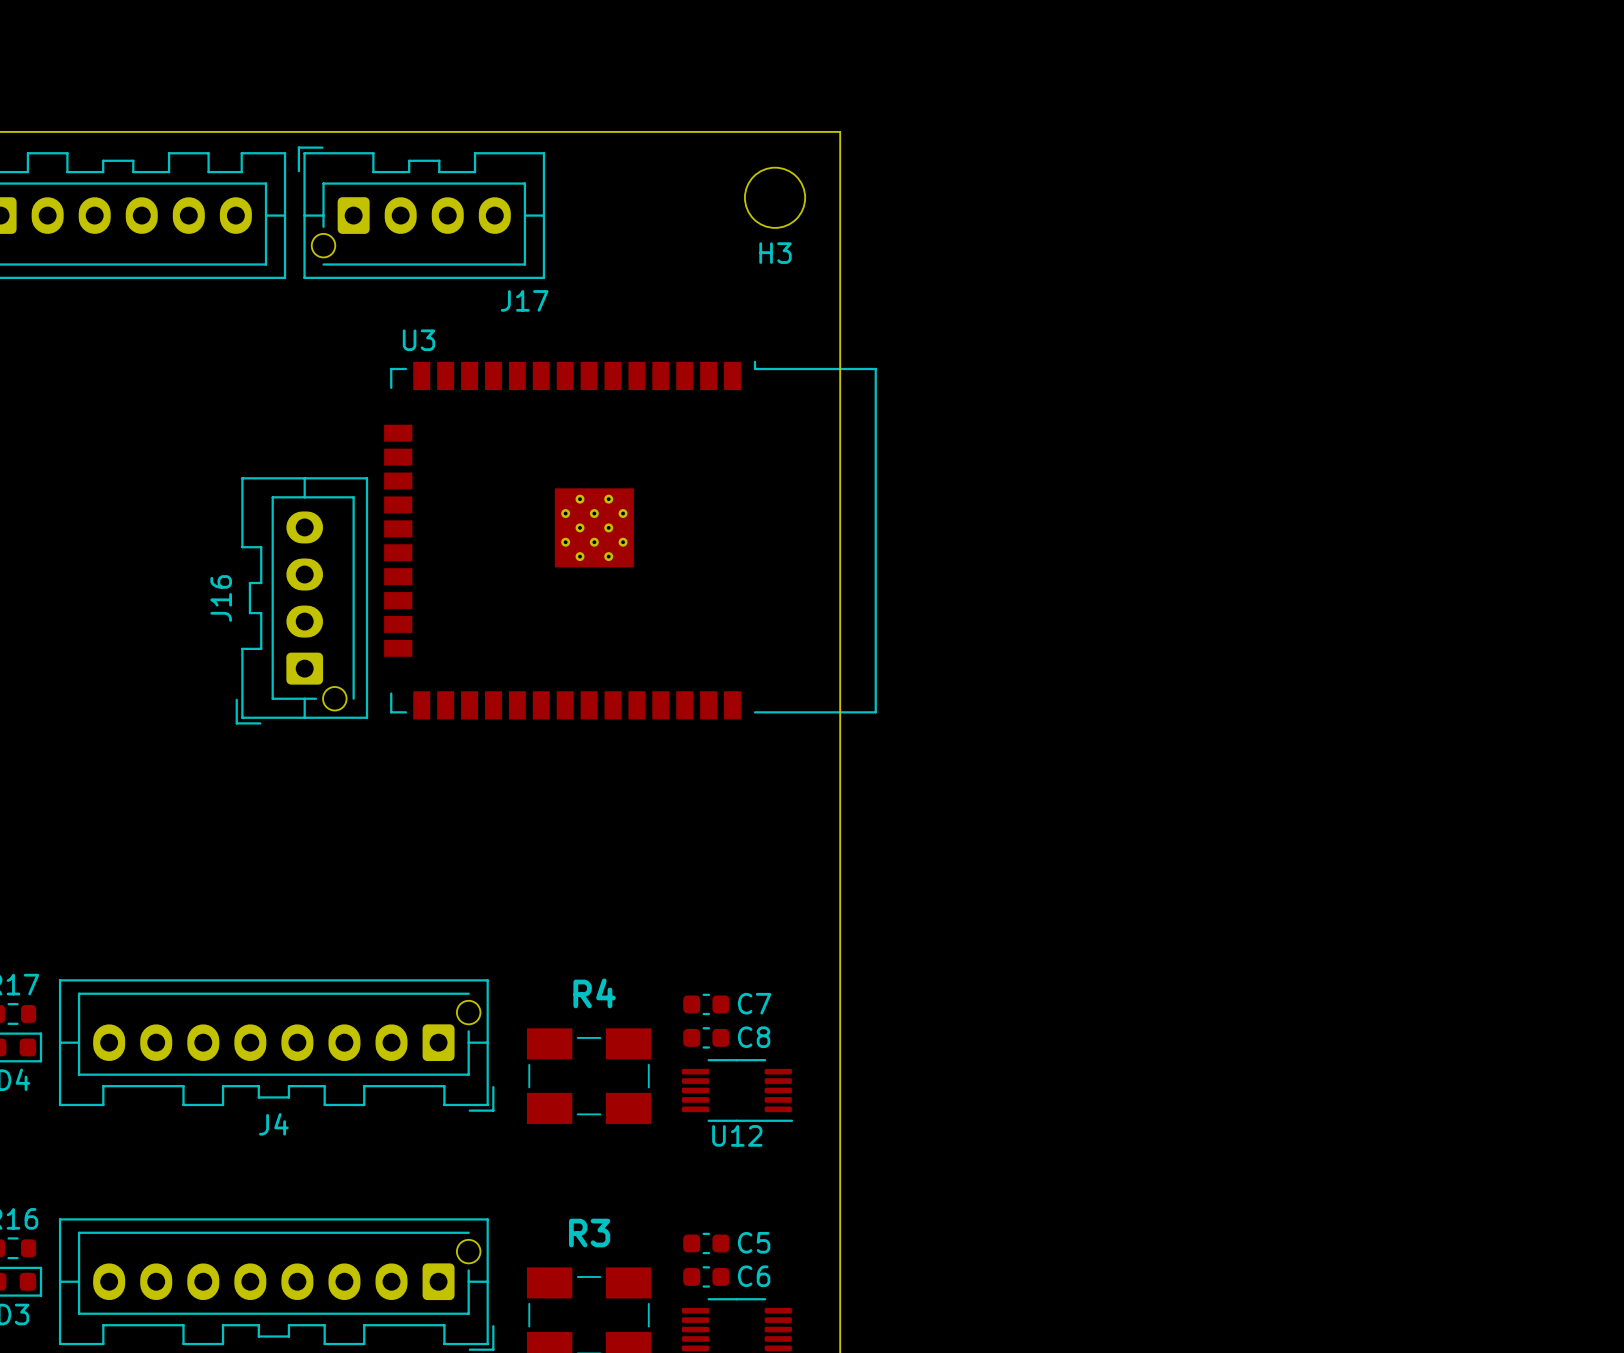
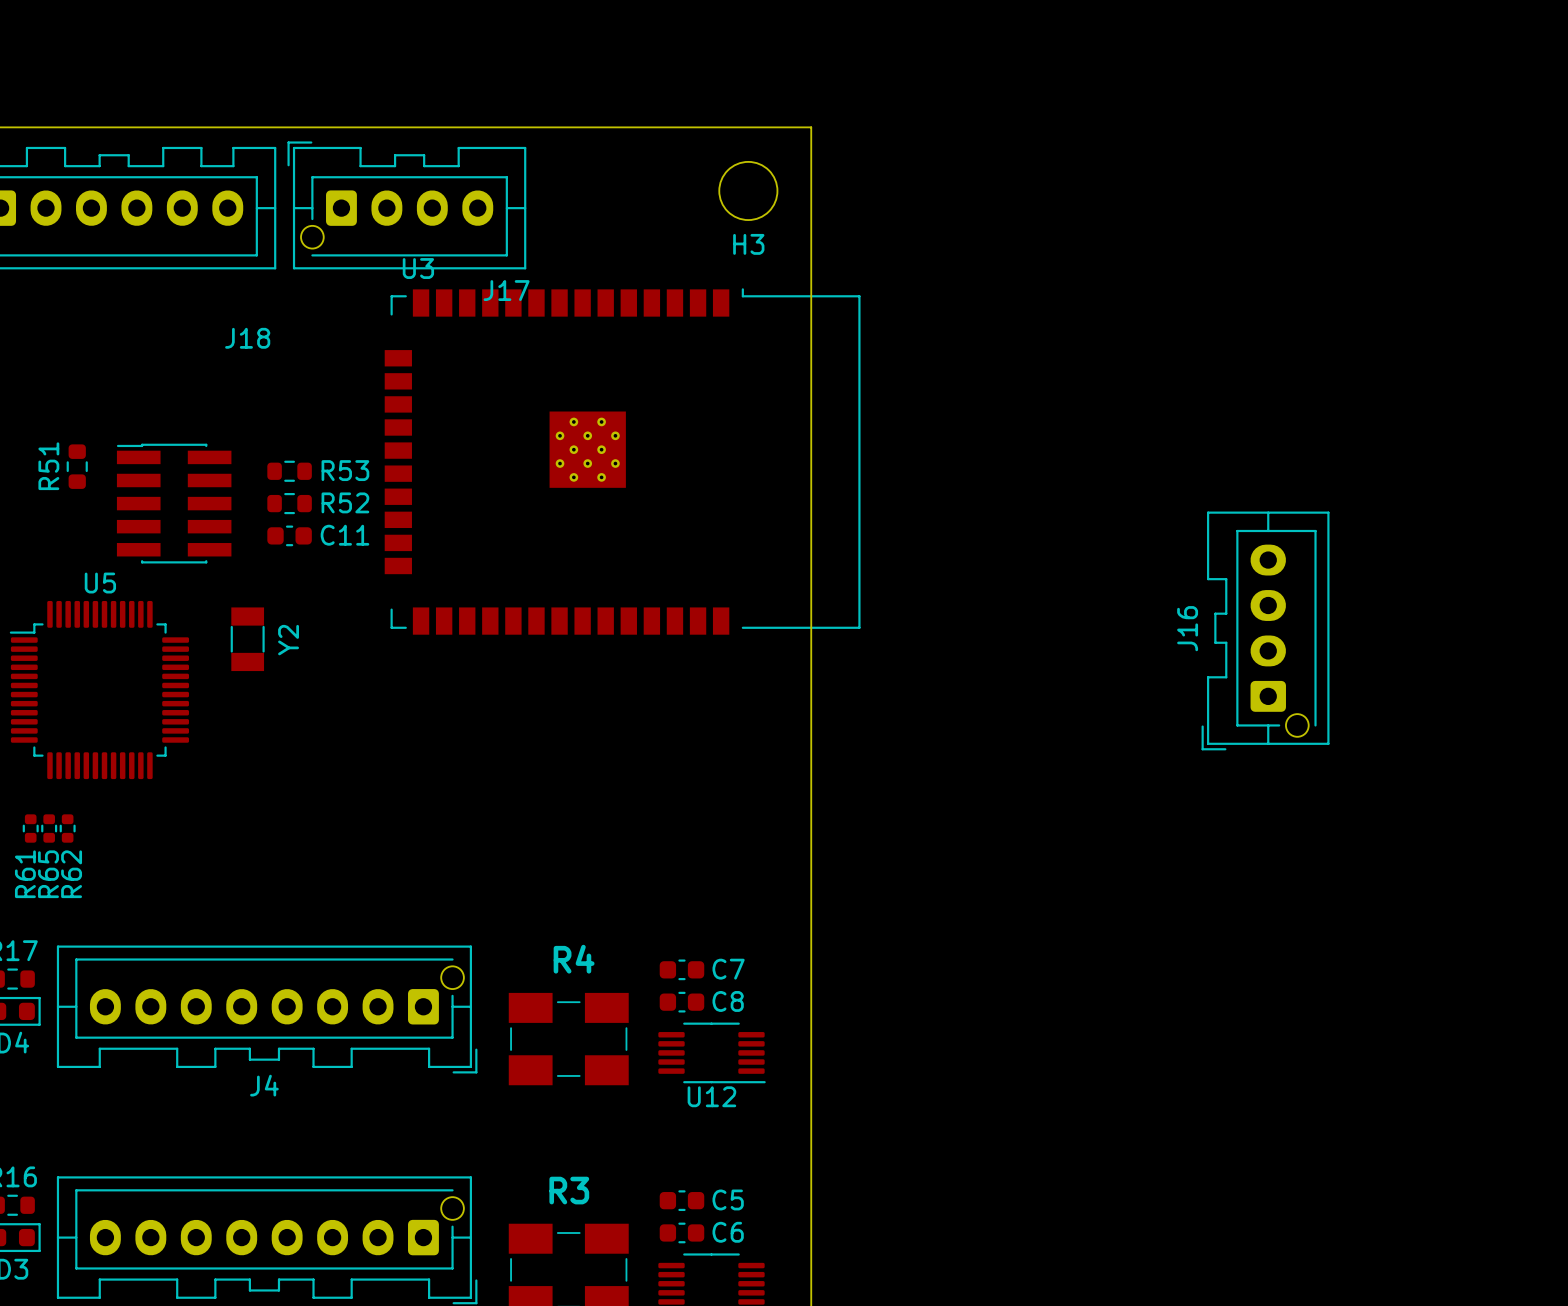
R51: none -> (77, 466)
R53: none -> (289, 471)
J18: none -> (174, 503)
R52: none -> (289, 503)
U3 position: (630, 540) -> (622, 461)
C11: none -> (289, 535)
J16 position: (301, 600) -> (1265, 630)
Y2: none -> (247, 639)
U5: none -> (99, 690)
R61: none -> (30, 828)
R65: none -> (49, 828)
R62: none -> (67, 828)

